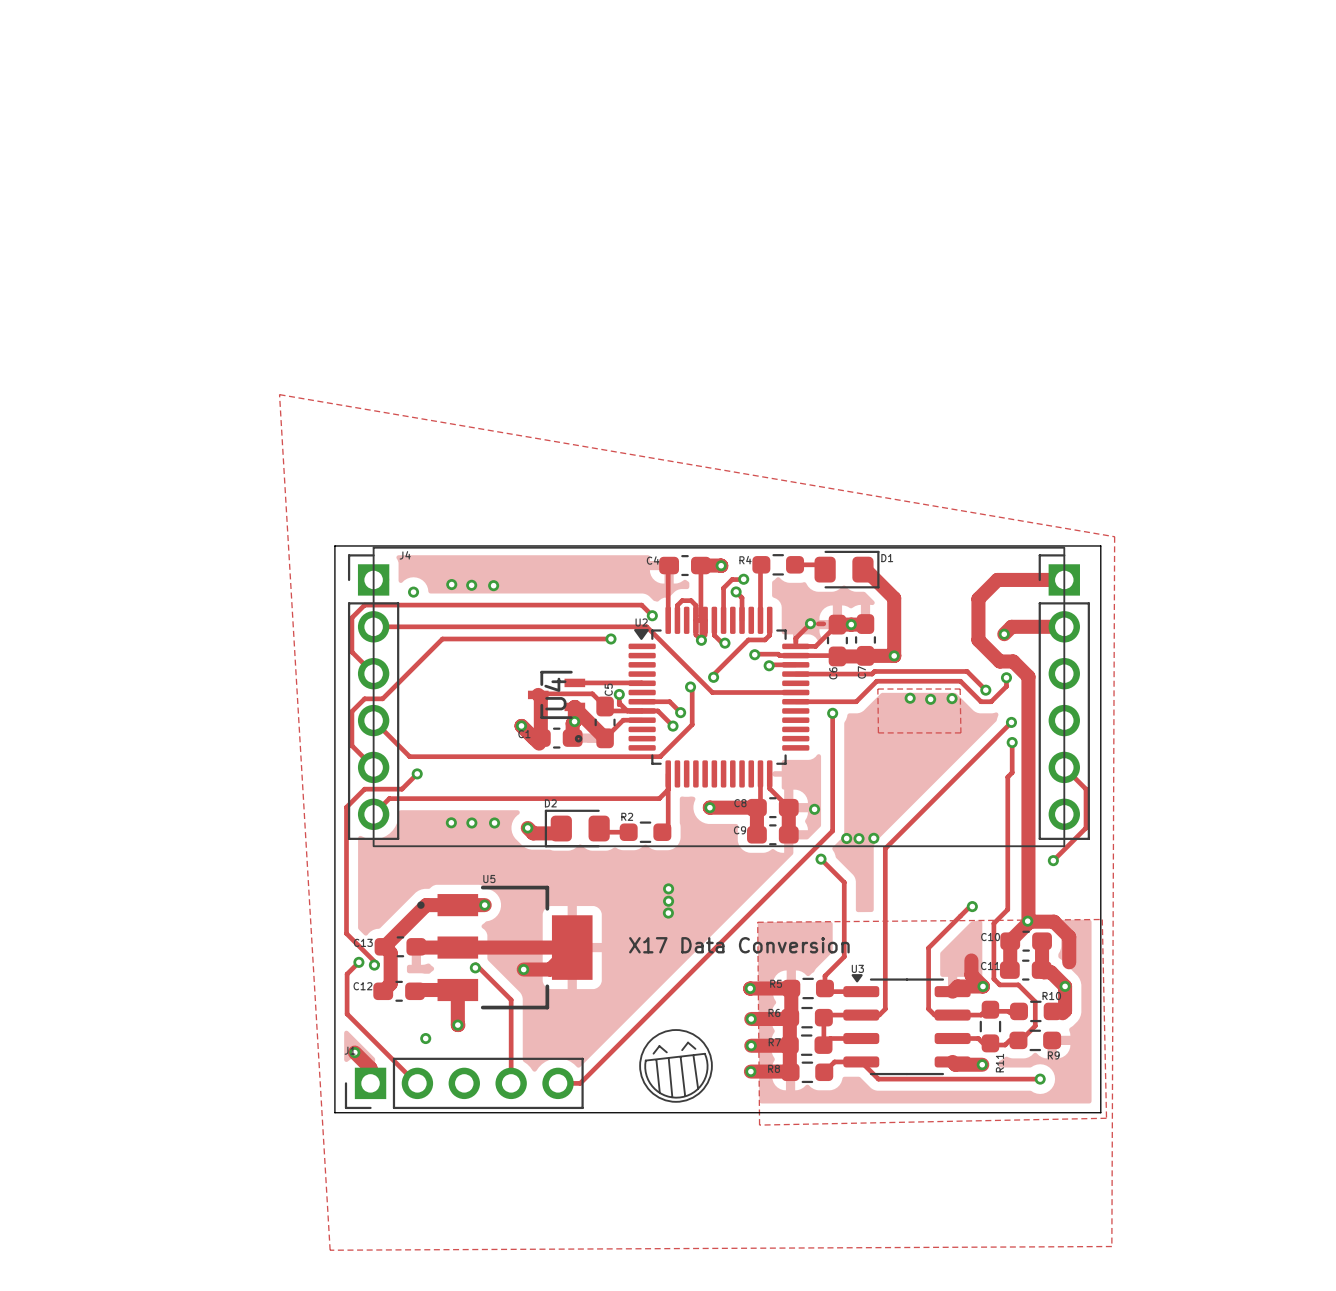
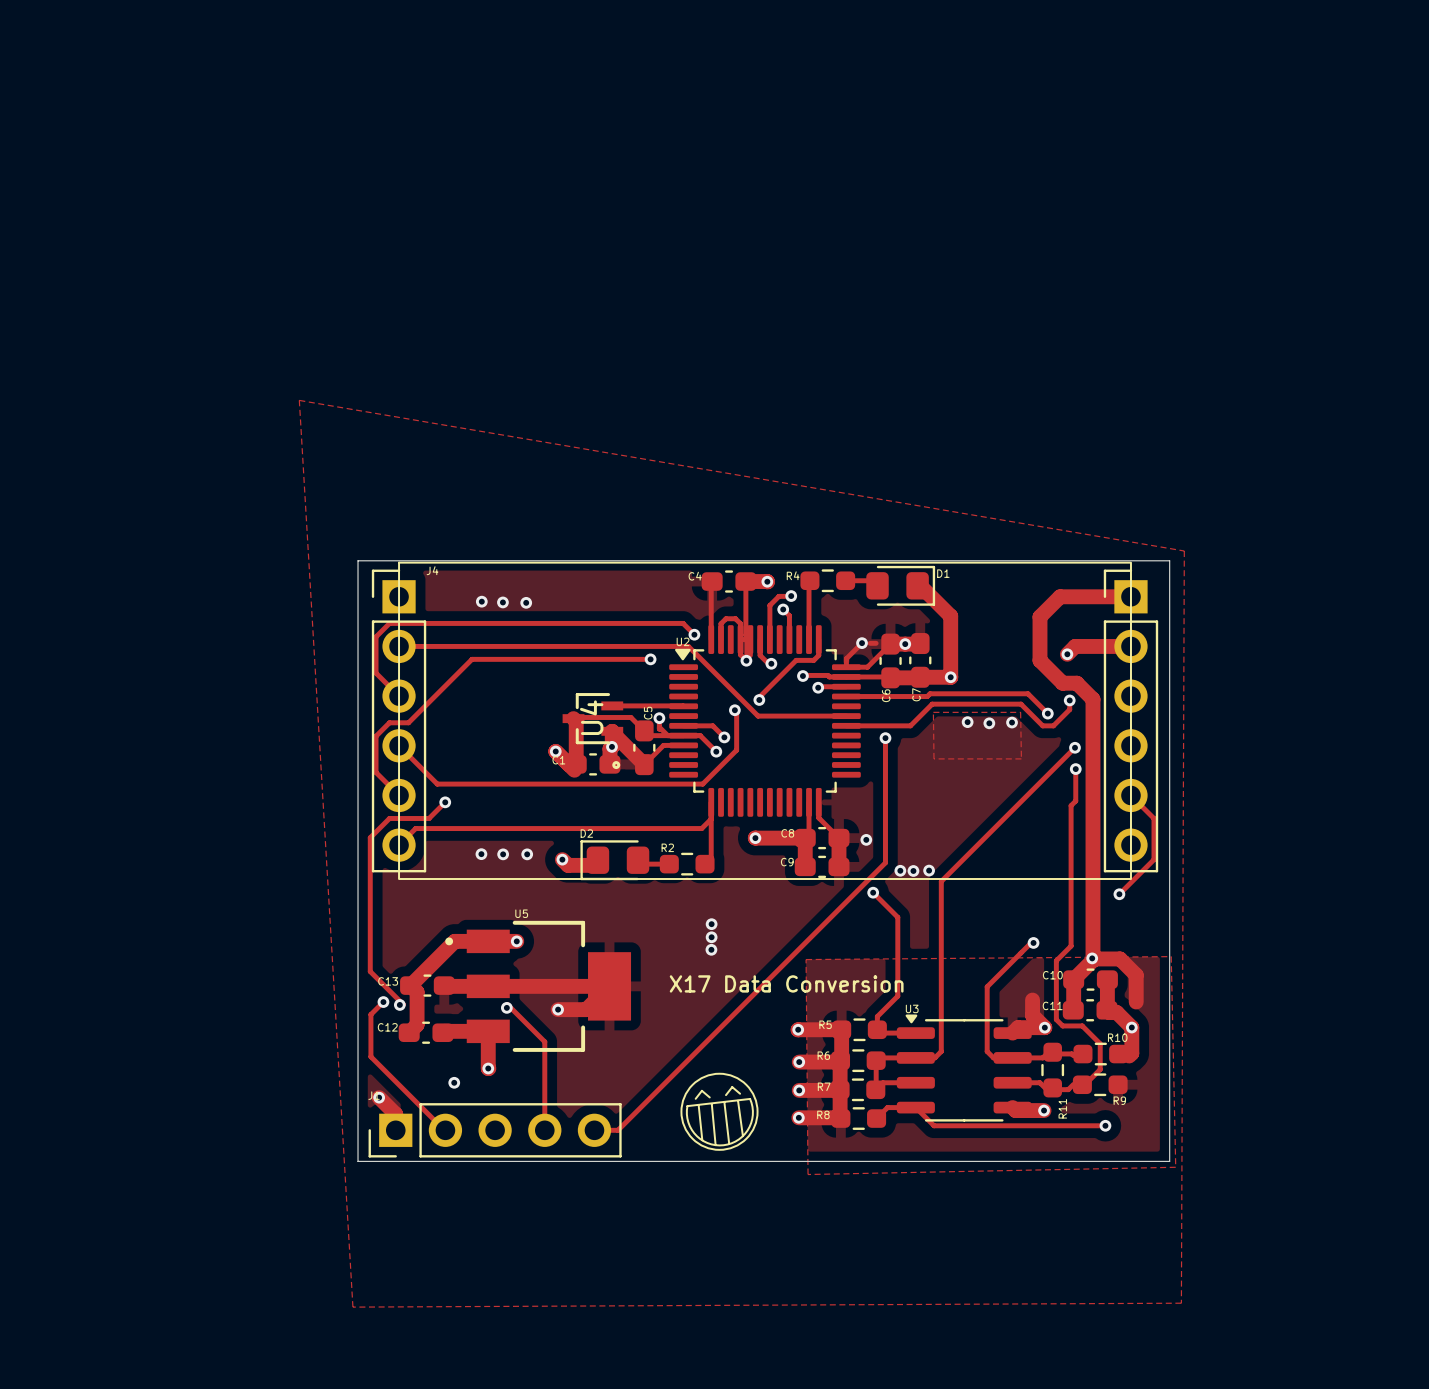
via: (413, 592) -> none

